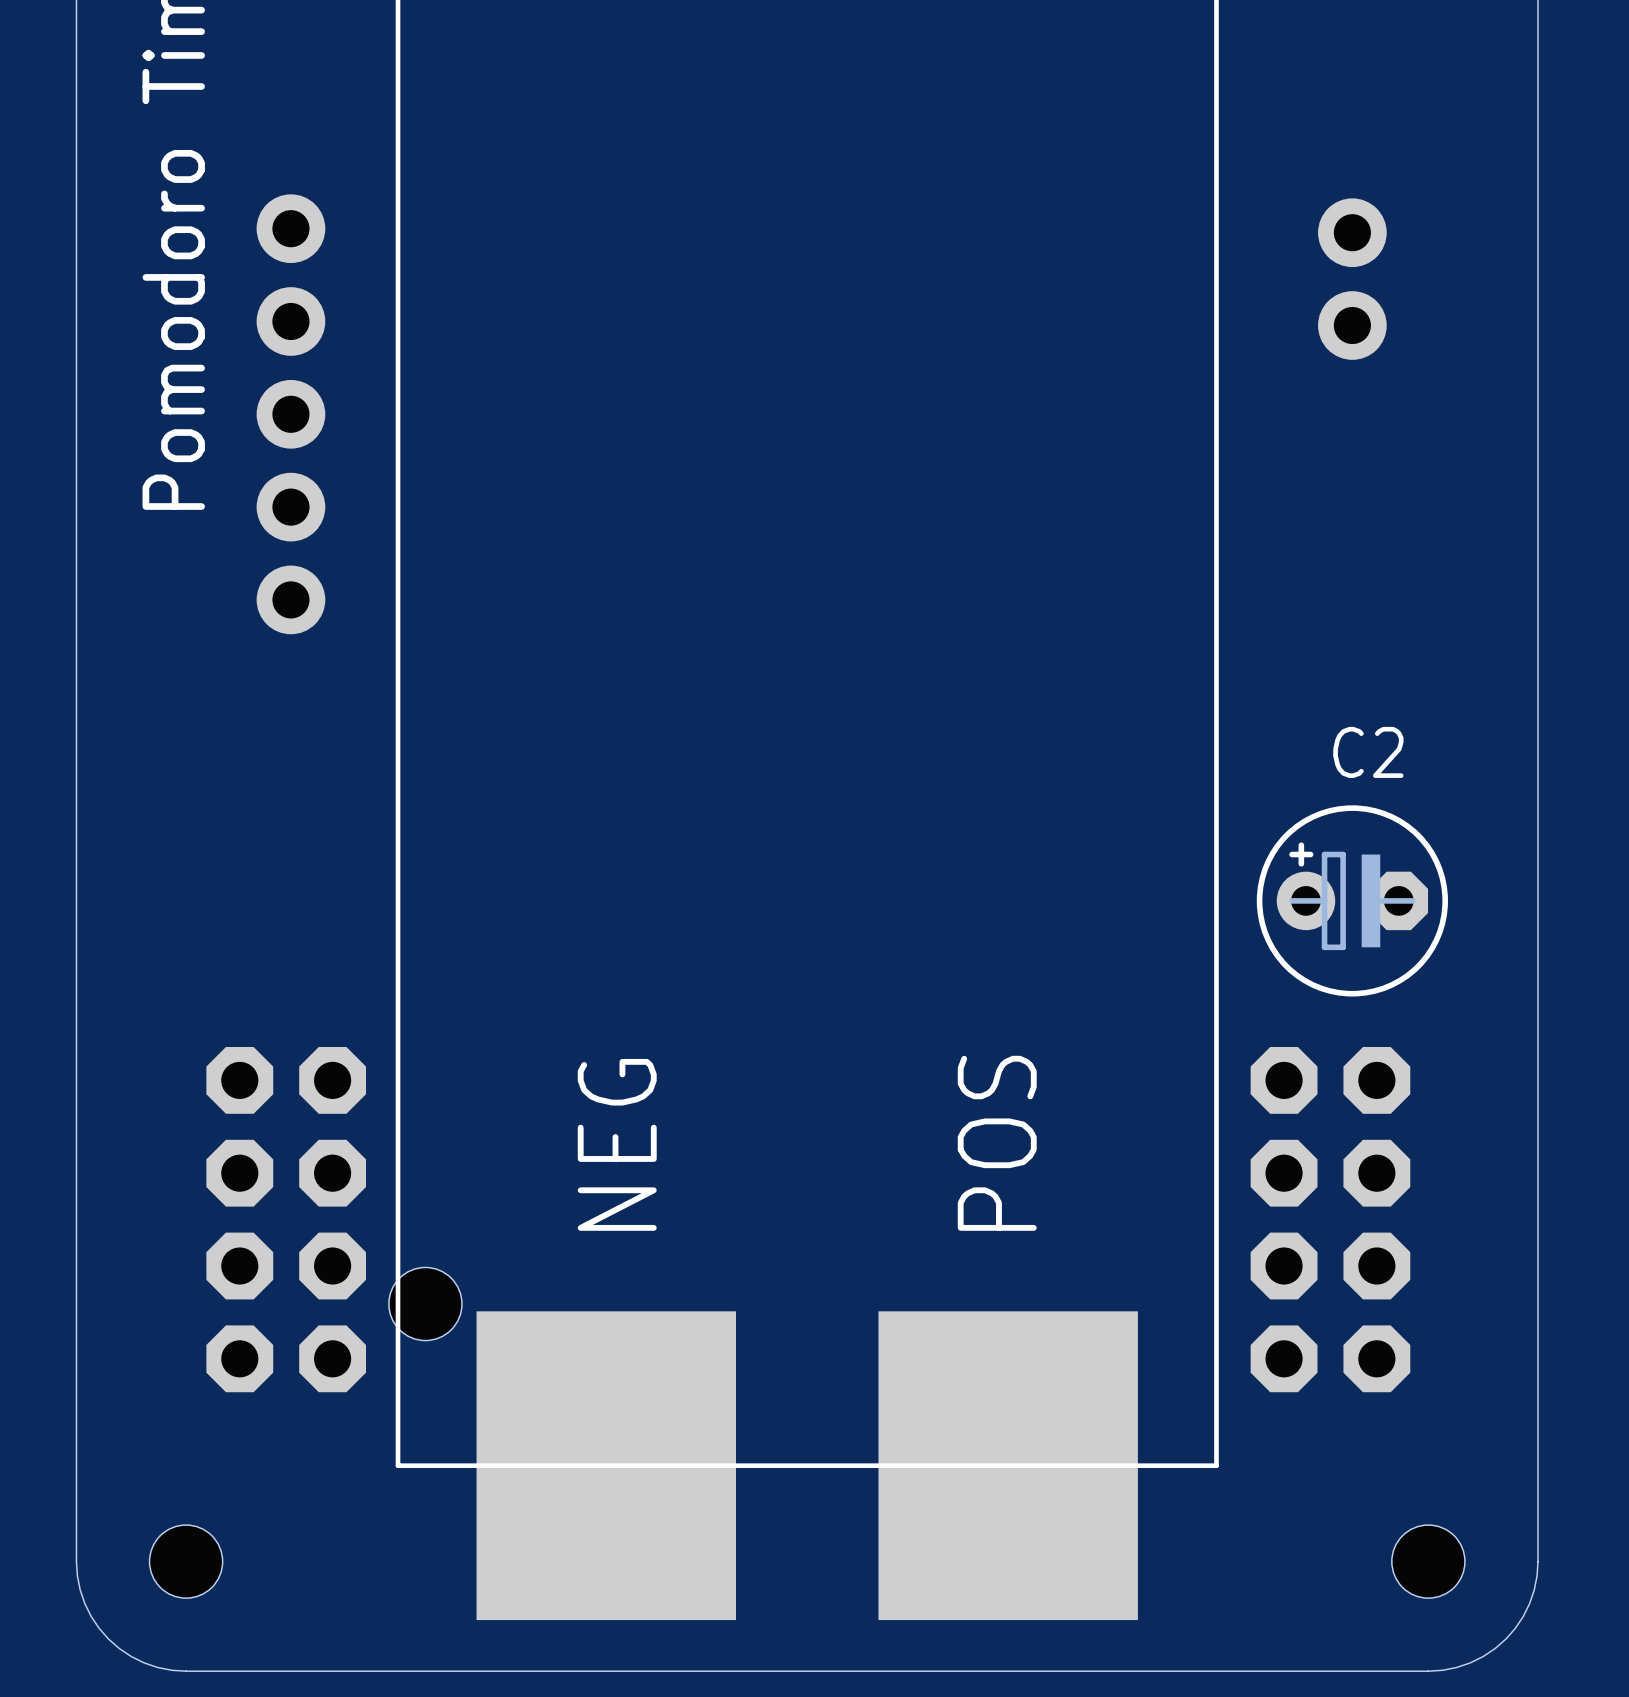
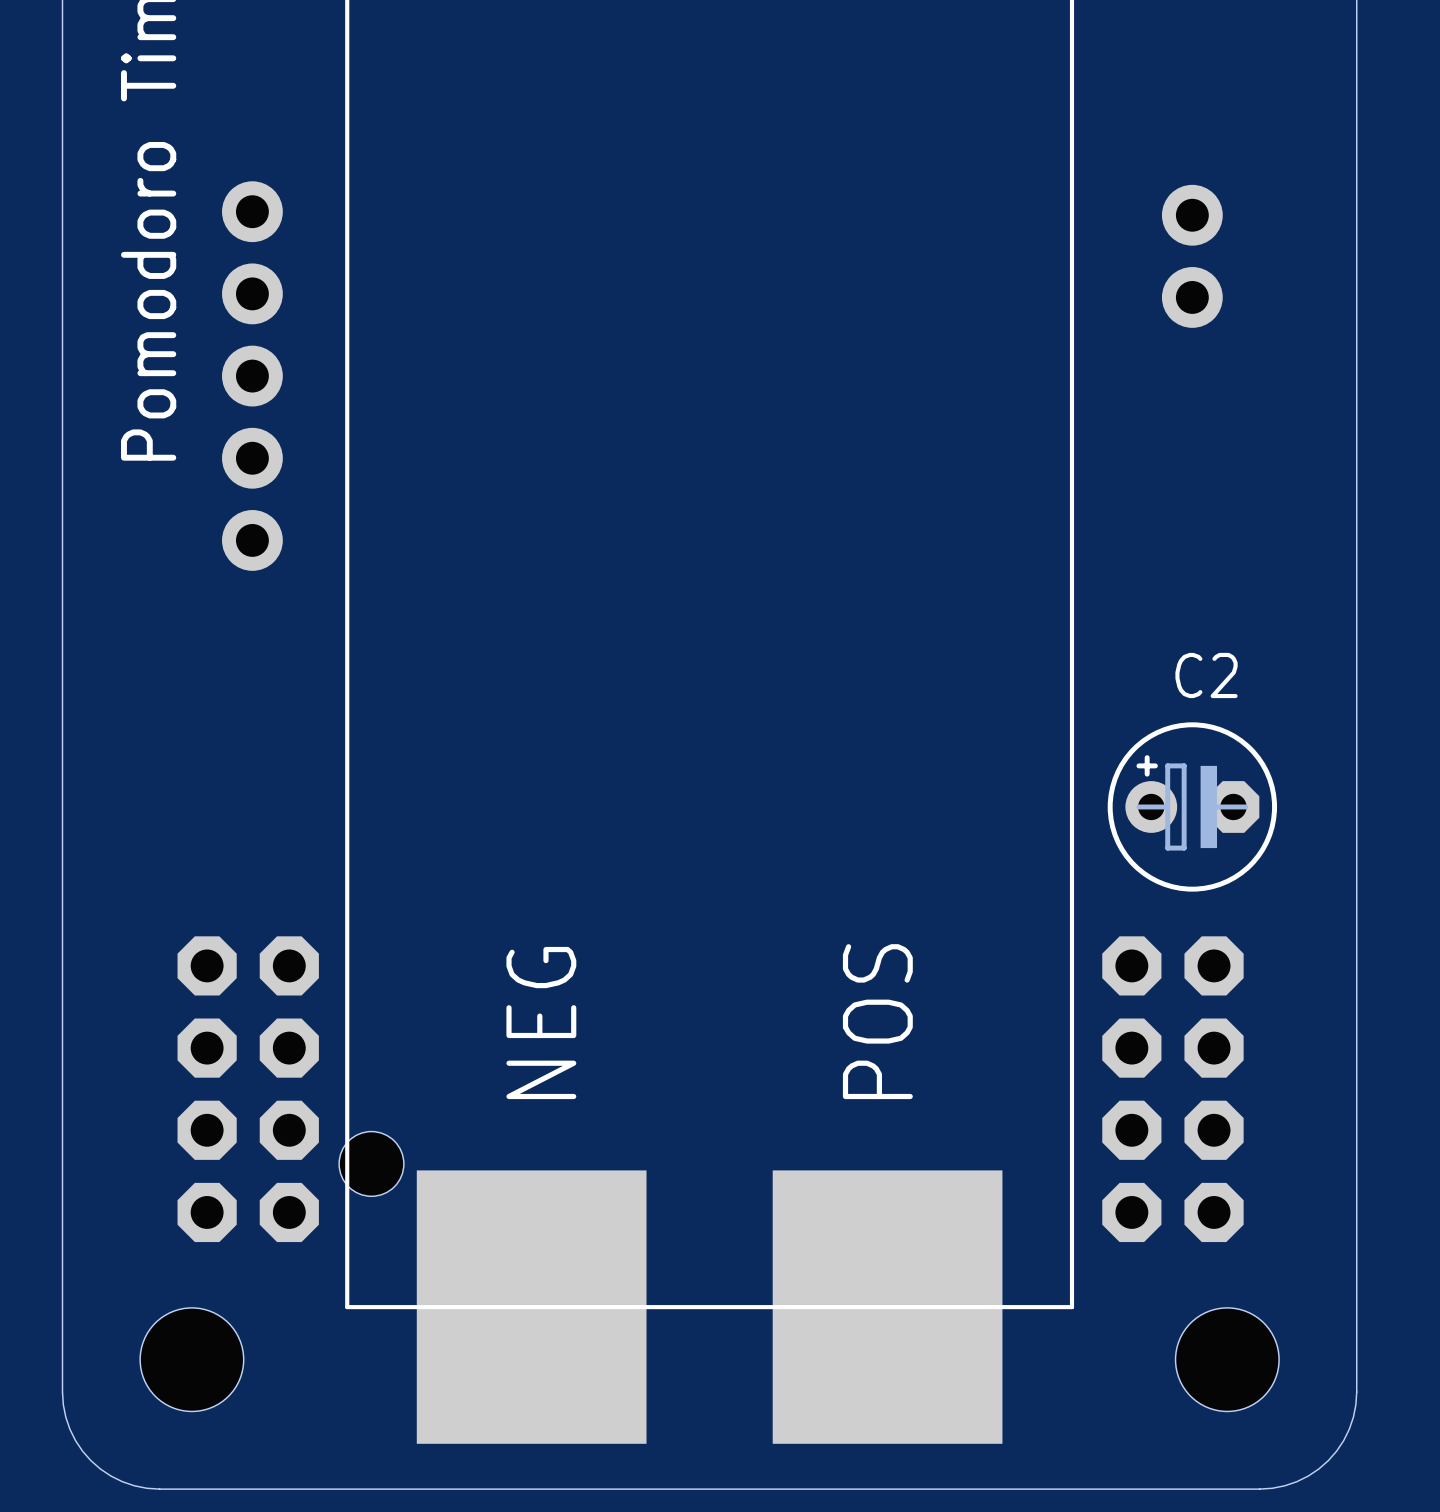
hole: none -> (191, 1359)
hole: none -> (1227, 1359)
hole: (186, 1561) -> none
hole: (1428, 1561) -> none

